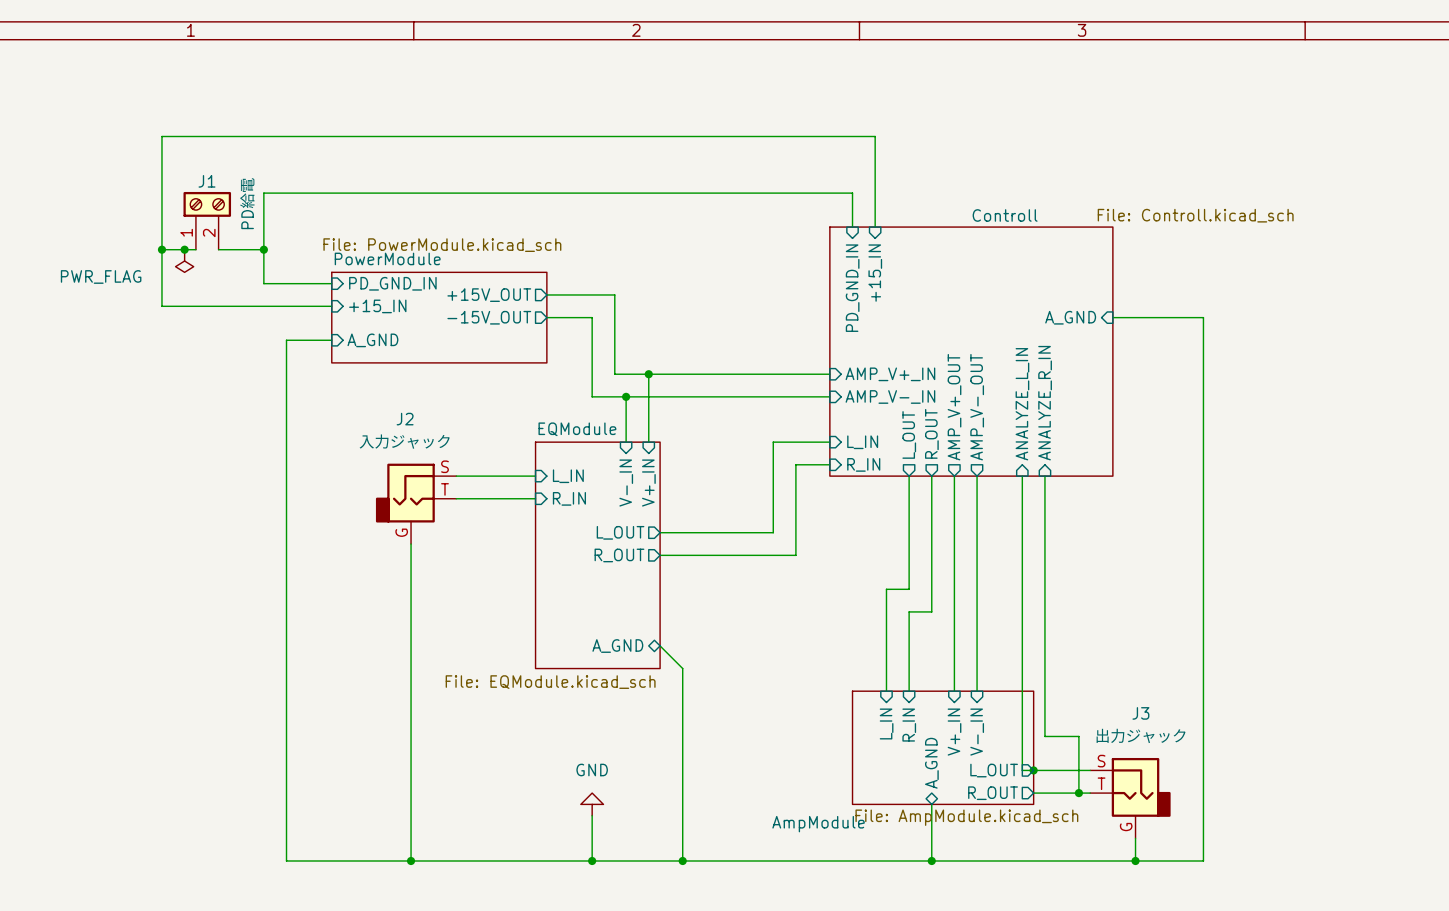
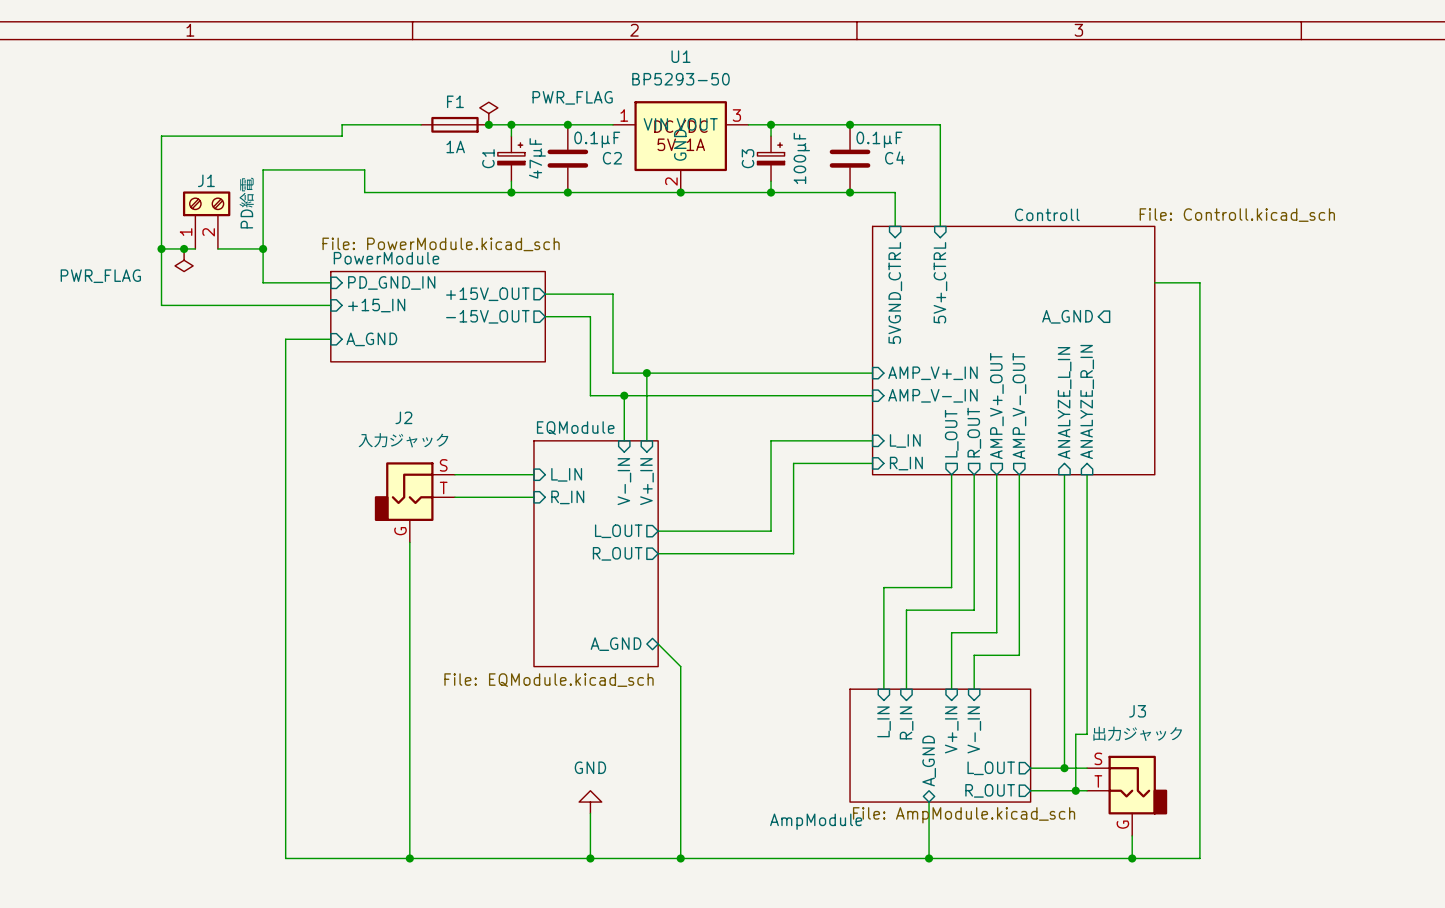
power symbol: none -> PWR_FLAG (488, 113)
F1: none -> 1A (454, 124)
wire: none -> (488, 124) (612, 124)
junction: none -> (488, 124)
wire: none -> (511, 124) (511, 136)
junction: none -> (511, 124)
junction: none -> (567, 124)
wire: none -> (748, 124) (940, 124) (940, 226)
wire: none -> (771, 124) (771, 136)
junction: none -> (771, 124)
junction: none -> (850, 124)
wire: (343, 136) (875, 136) (875, 227) -> (342, 136) (342, 124) (421, 124)
U1: none -> BP5293-50 (680, 146)
C1: none -> 47μF (511, 158)
C2: none -> 0.1μF (567, 158)
C3: none -> 100μF (771, 158)
C4: none -> 0.1μF (850, 158)
wire: none -> (511, 181) (511, 192)
wire: none -> (771, 181) (771, 192)
wire: (263, 193) (365, 193) -> (263, 192) (263, 169) (364, 169) (364, 192)
junction: none -> (511, 192)
junction: none -> (567, 192)
junction: none -> (680, 192)
junction: none -> (771, 192)
wire: (852, 193) (852, 227) -> (850, 192) (895, 192) (895, 226)
junction: none -> (850, 192)
sheet pin: +15_IN (875, 273) -> none
sheet pin: none -> 5V+_CTRL (940, 282)
sheet pin: PD_GND_IN (852, 288) -> none
sheet pin: none -> 5VGND_CTRL (895, 292)
wire: (1112, 317) (1203, 317) -> (1154, 282) (1199, 282) (1199, 316)
sheet Controll position: (971, 351) -> (1013, 350)
wire: none -> (827, 373) (872, 373)
sheet pin position: AMP_V+_IN (890, 374) -> AMP_V+_IN (932, 373)
wire: none -> (827, 395) (872, 395)
sheet pin position: AMP_V-_IN (890, 396) -> AMP_V-_IN (932, 395)
sheet pin position: ANALYZE_R_IN (1045, 403) -> ANALYZE_R_IN (1087, 401)
sheet pin shape: input (1022, 404) -> output (1019, 406)
sheet pin: ANALYZE_L_IN (1022, 404) -> AMP_V-_OUT (1019, 406)
sheet pin: none -> ANALYZE_L_IN (1064, 403)
sheet pin: AMP_V+_OUT (954, 407) -> L_OUT (951, 433)
sheet pin: AMP_V-_OUT (977, 407) -> R_OUT (974, 432)
sheet pin: none -> AMP_V+_OUT (996, 406)
sheet pin: R_OUT (931, 433) -> none
sheet pin: L_OUT (909, 434) -> none
wire: none -> (827, 440) (872, 440)
sheet pin position: L_IN (862, 442) -> L_IN (905, 440)
wire: none -> (827, 463) (872, 463)
sheet pin position: R_IN (863, 464) -> R_IN (906, 463)
wire: (909, 476) (909, 589) -> none
wire: (931, 476) (931, 611) -> none
wire: none -> (996, 474) (996, 632) (951, 632)
wire: (1044, 476) (1044, 736) (1078, 736) -> (1087, 474) (1087, 734) (1075, 734)
wire: none -> (1064, 474) (1064, 768)
wire: (954, 589) (954, 634) -> (951, 587) (906, 587)
wire: (977, 611) (977, 657) -> (974, 610) (929, 610)
wire: (1022, 657) (1022, 770) (1033, 770) -> (1019, 655) (974, 655)
junction position: (1033, 770) -> (1064, 768)

